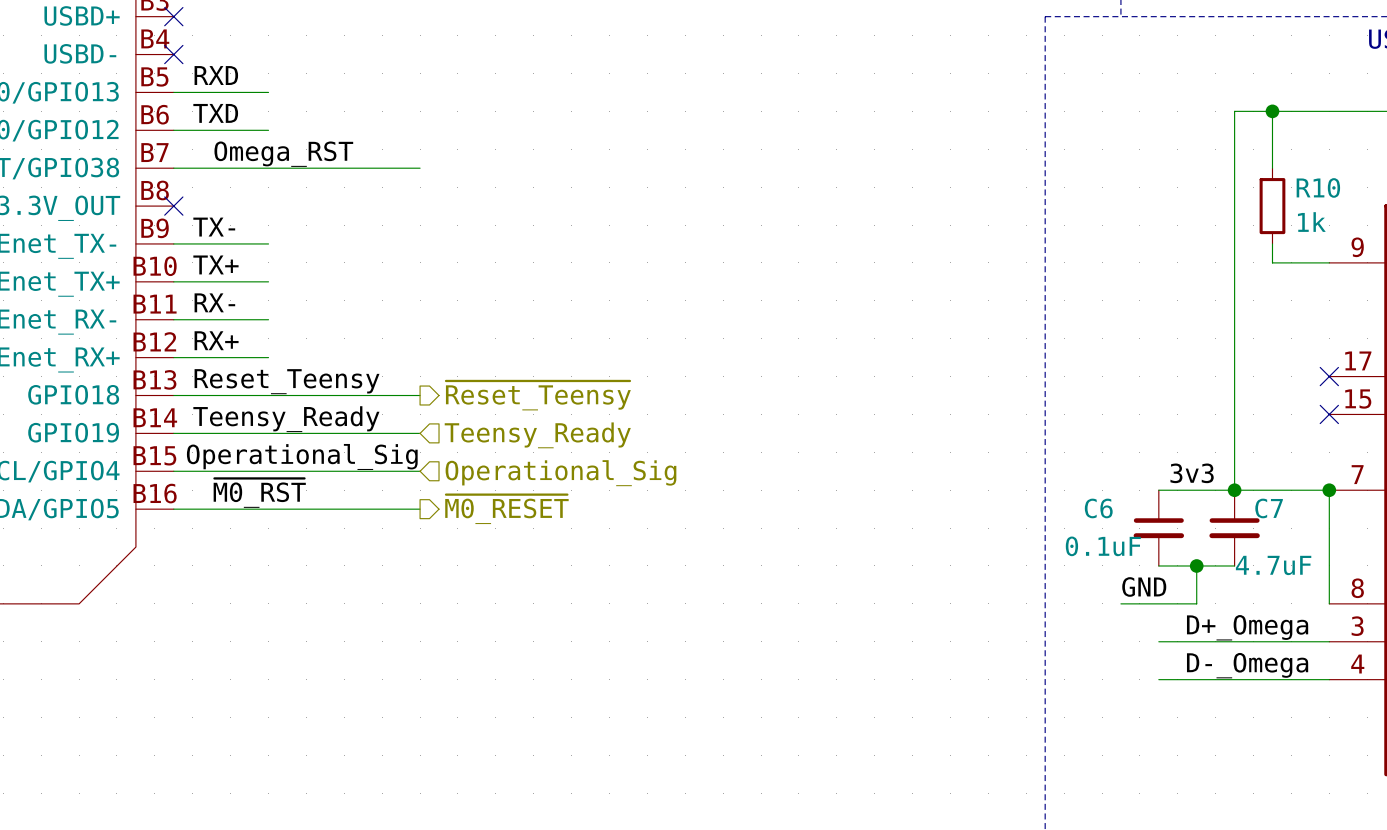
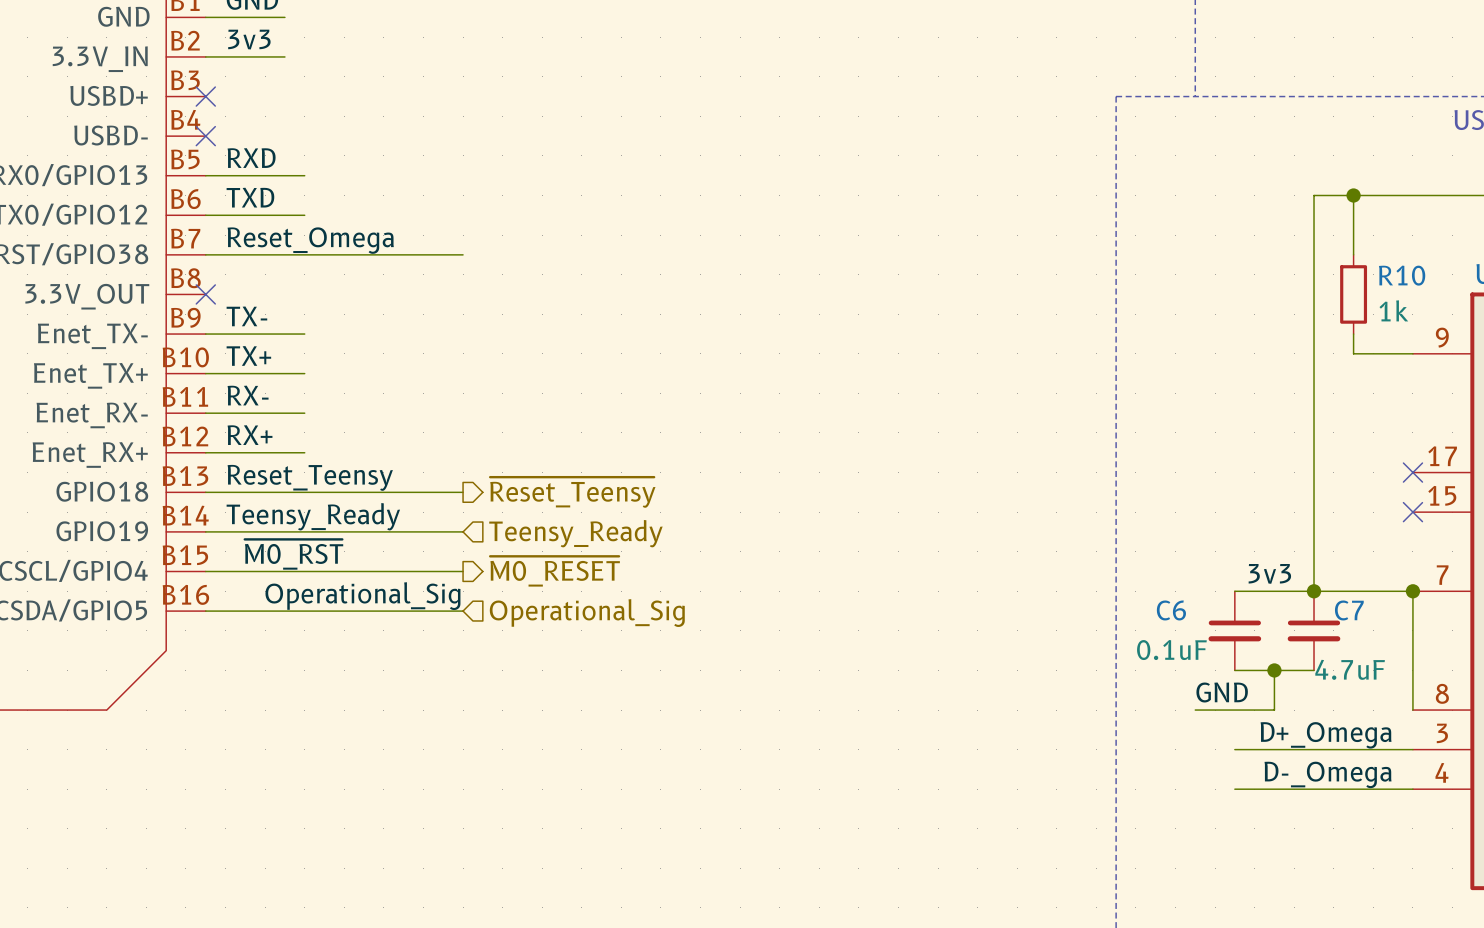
label: none -> Reset_Omega (310, 240)
label: Omega_RST (283, 154) -> none
label position: Operational_Sig (302, 456) -> Operational_Sig (362, 596)
hierarchical label shape: input (560, 473) -> output (555, 571)
hierarchical label: Operational_Sig (560, 473) -> ~{M0_RESET} (555, 571)
label position: ~{M0_RST} (259, 493) -> ~{M0_RST} (293, 554)
hierarchical label shape: output (506, 509) -> input (587, 613)
hierarchical label: ~{M0_RESET} (506, 509) -> Operational_Sig (587, 613)

